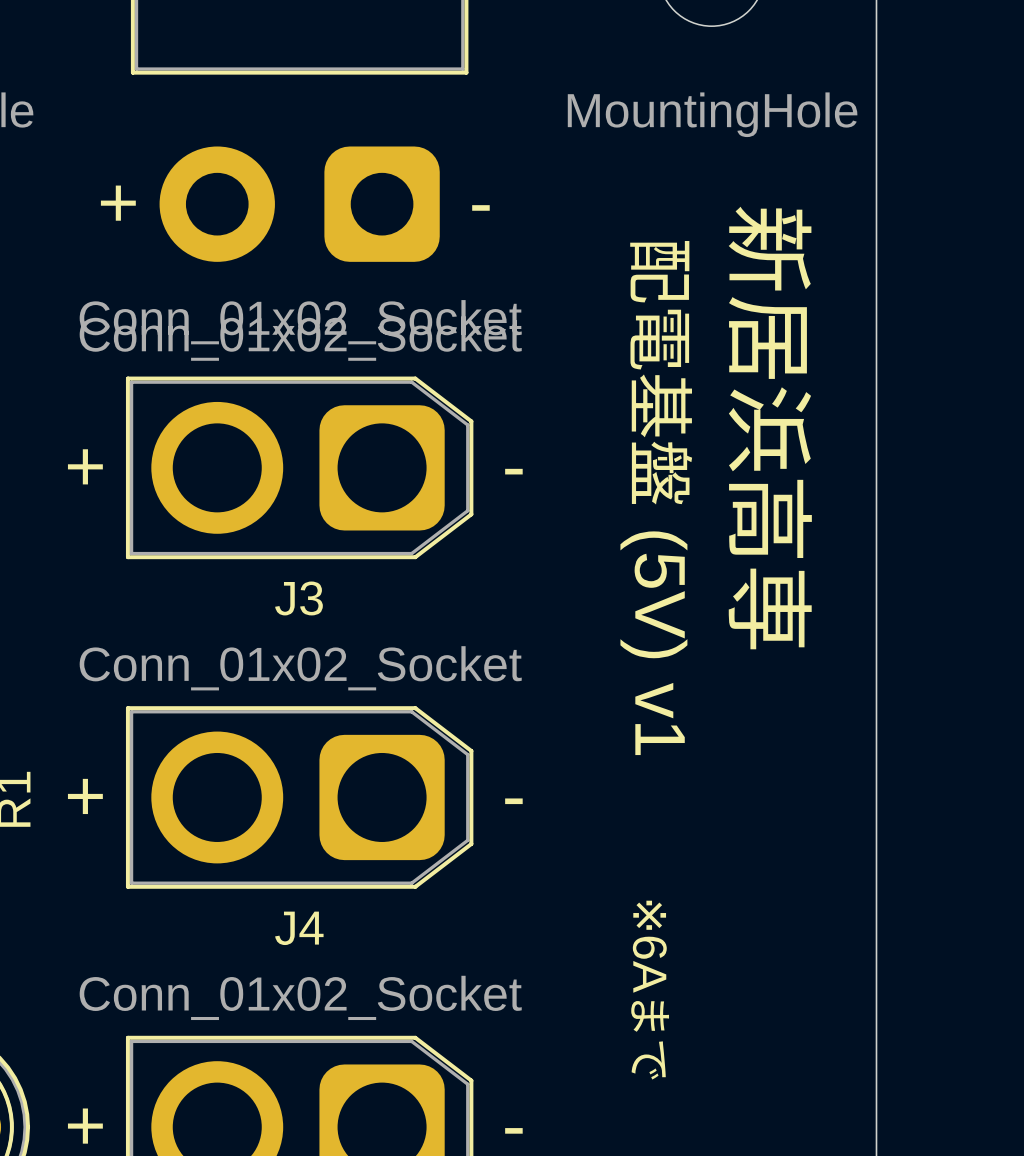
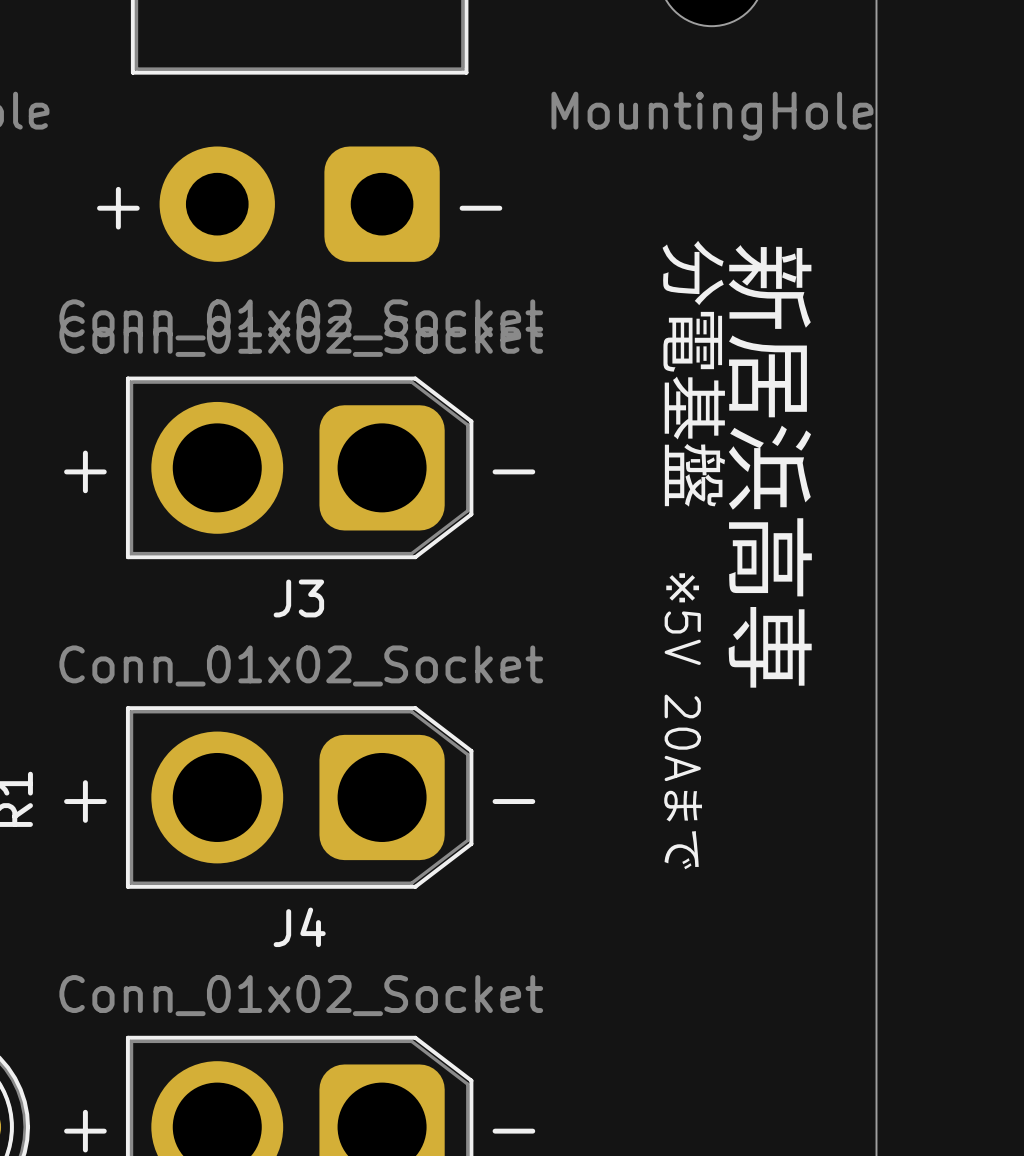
text position: 新居浜高専 (770, 427) -> 新居浜高専 (770, 466)
text: 配電基盤 (5V) v1 (656, 498) -> 分電基盤 (693, 373)
text: none -> ※5V 20Aまで (683, 721)
text: ※6Aまで (650, 990) -> none

